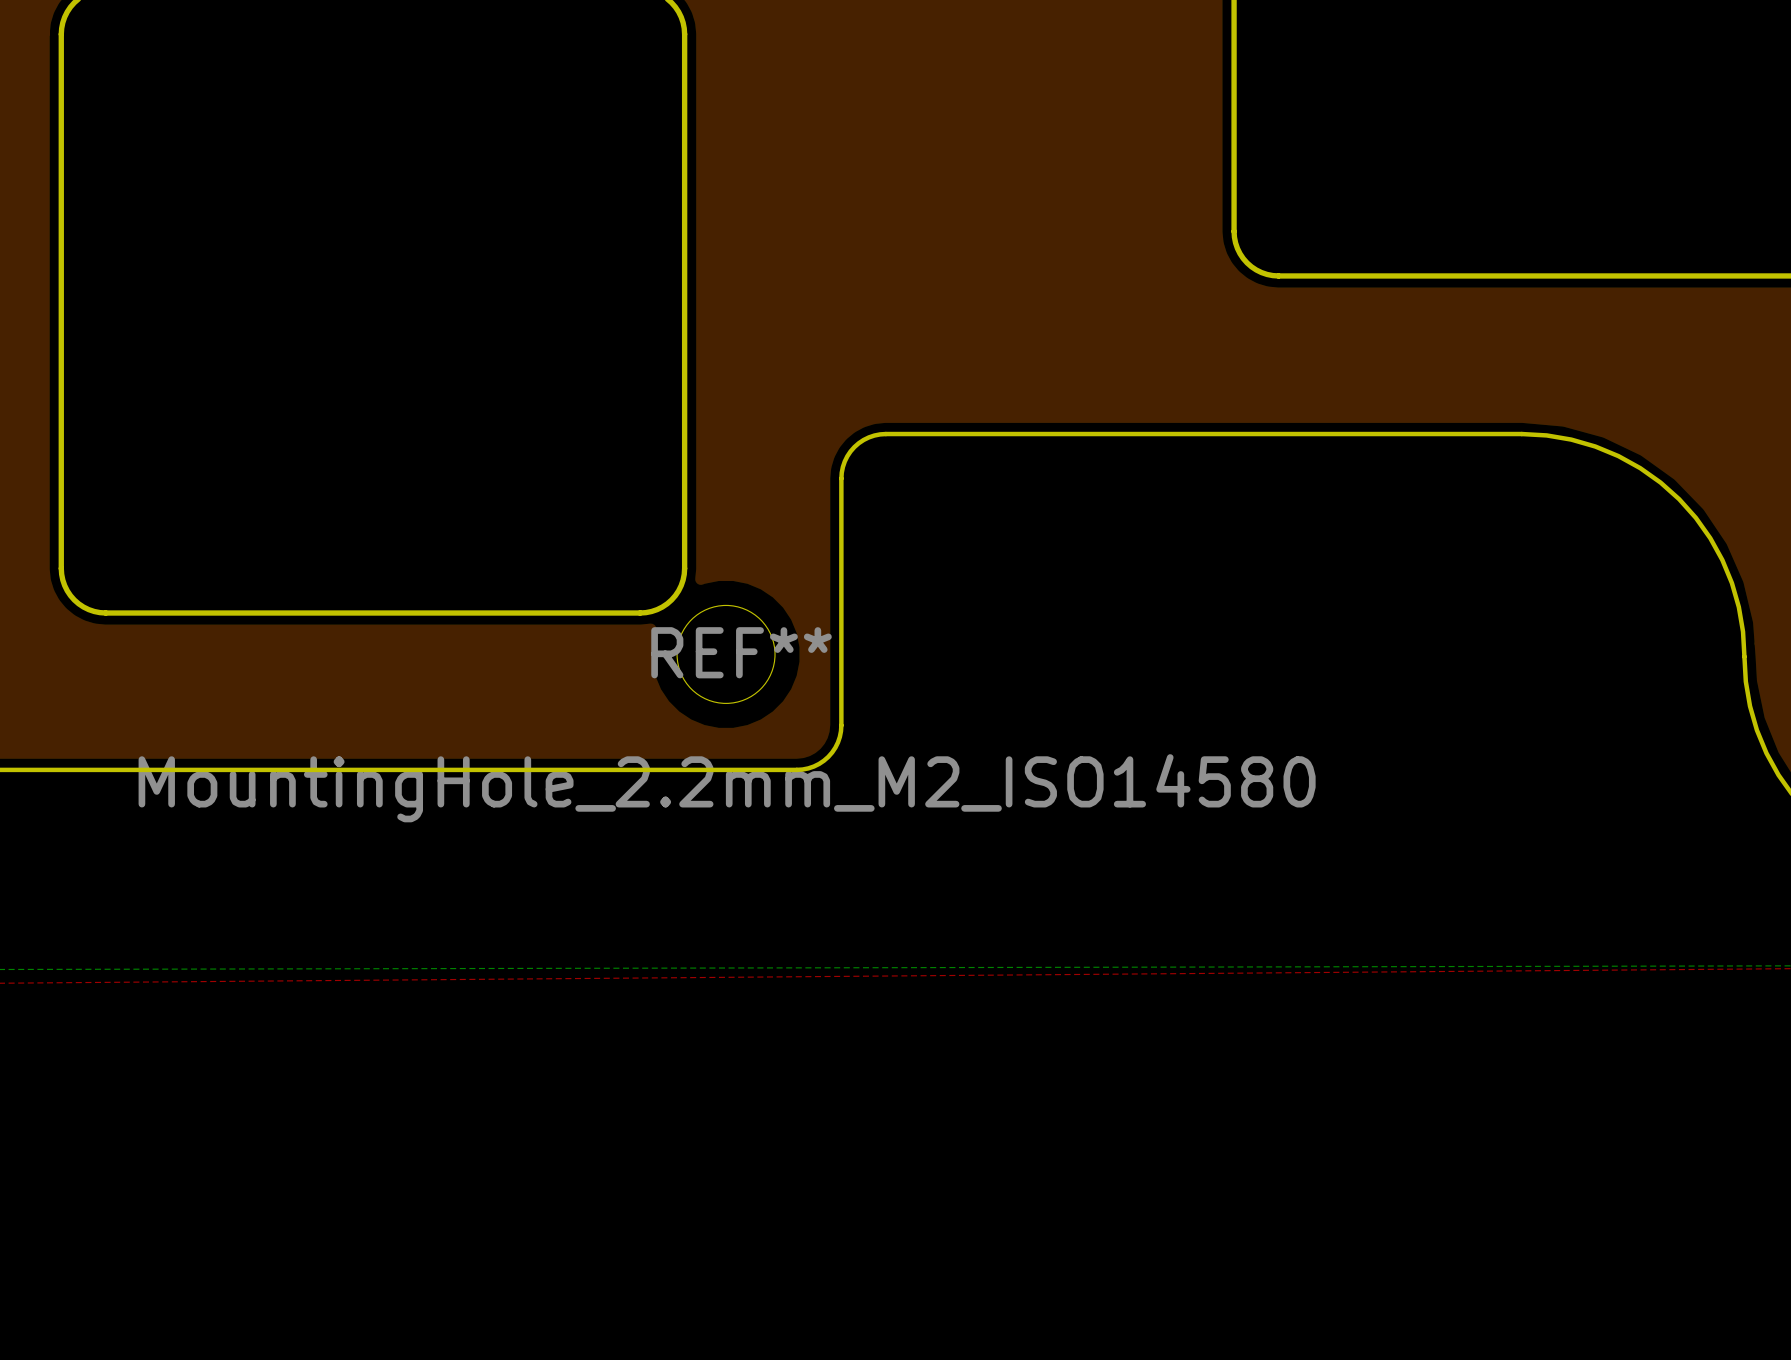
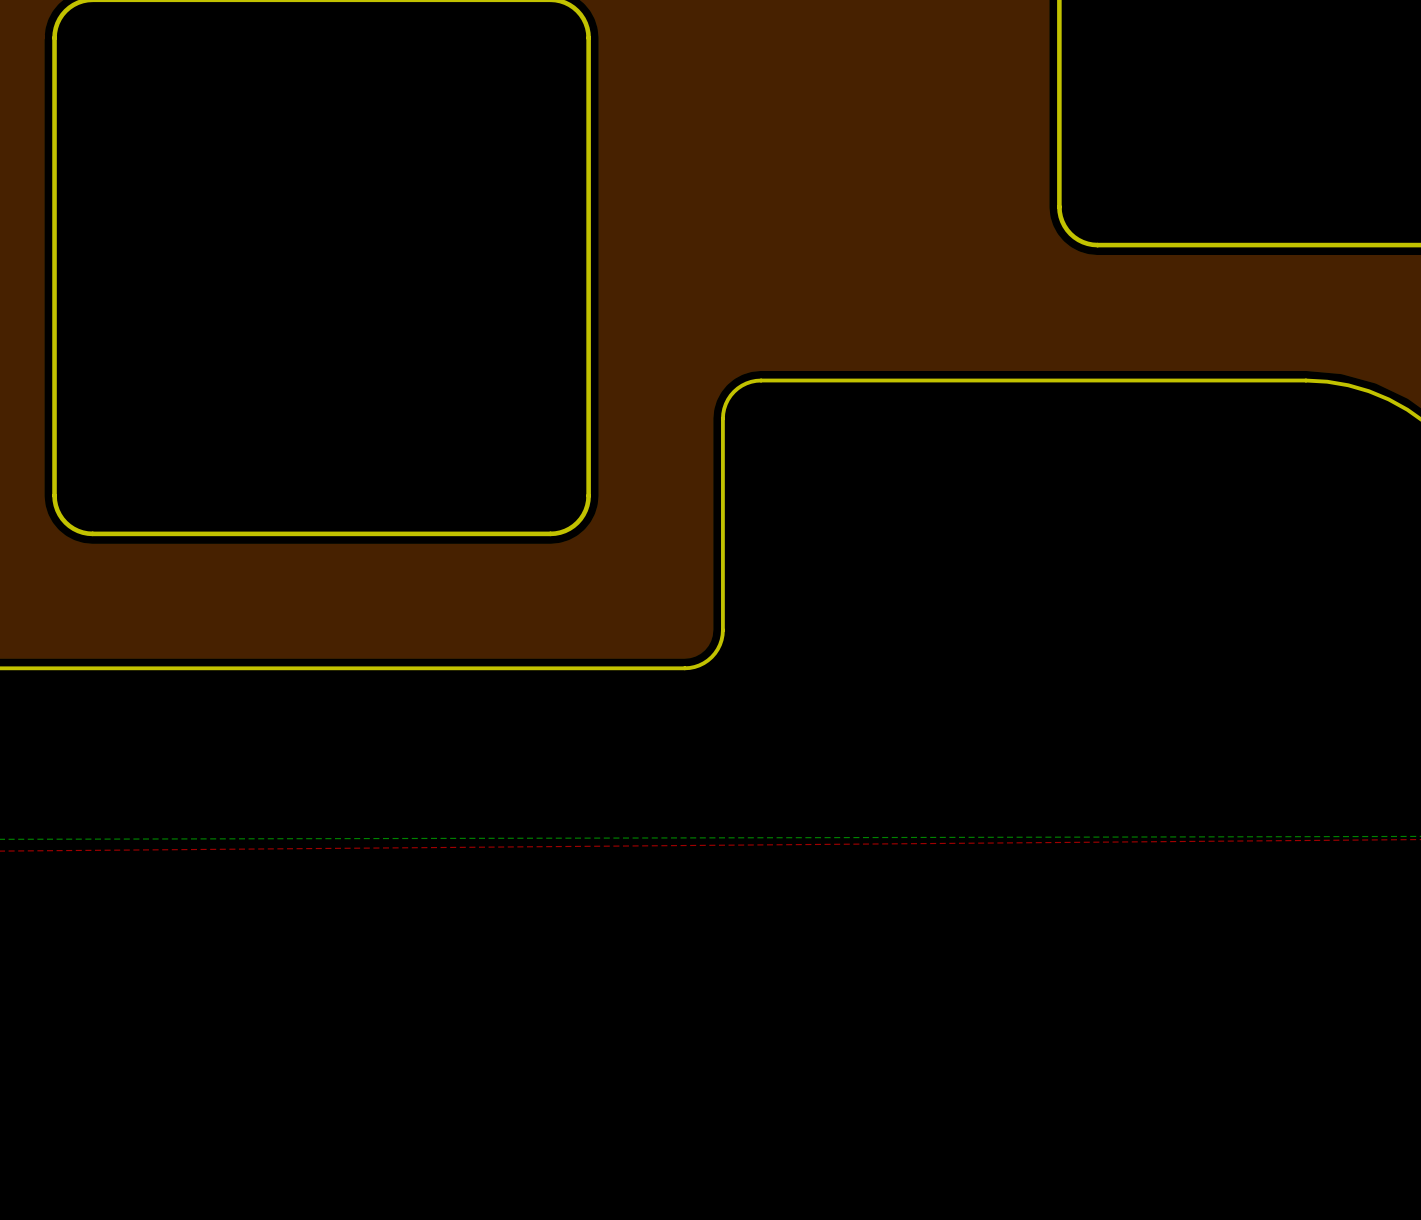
REF**: MountingHole_2.2mm_M2_ISO14580 (726, 654) -> none

